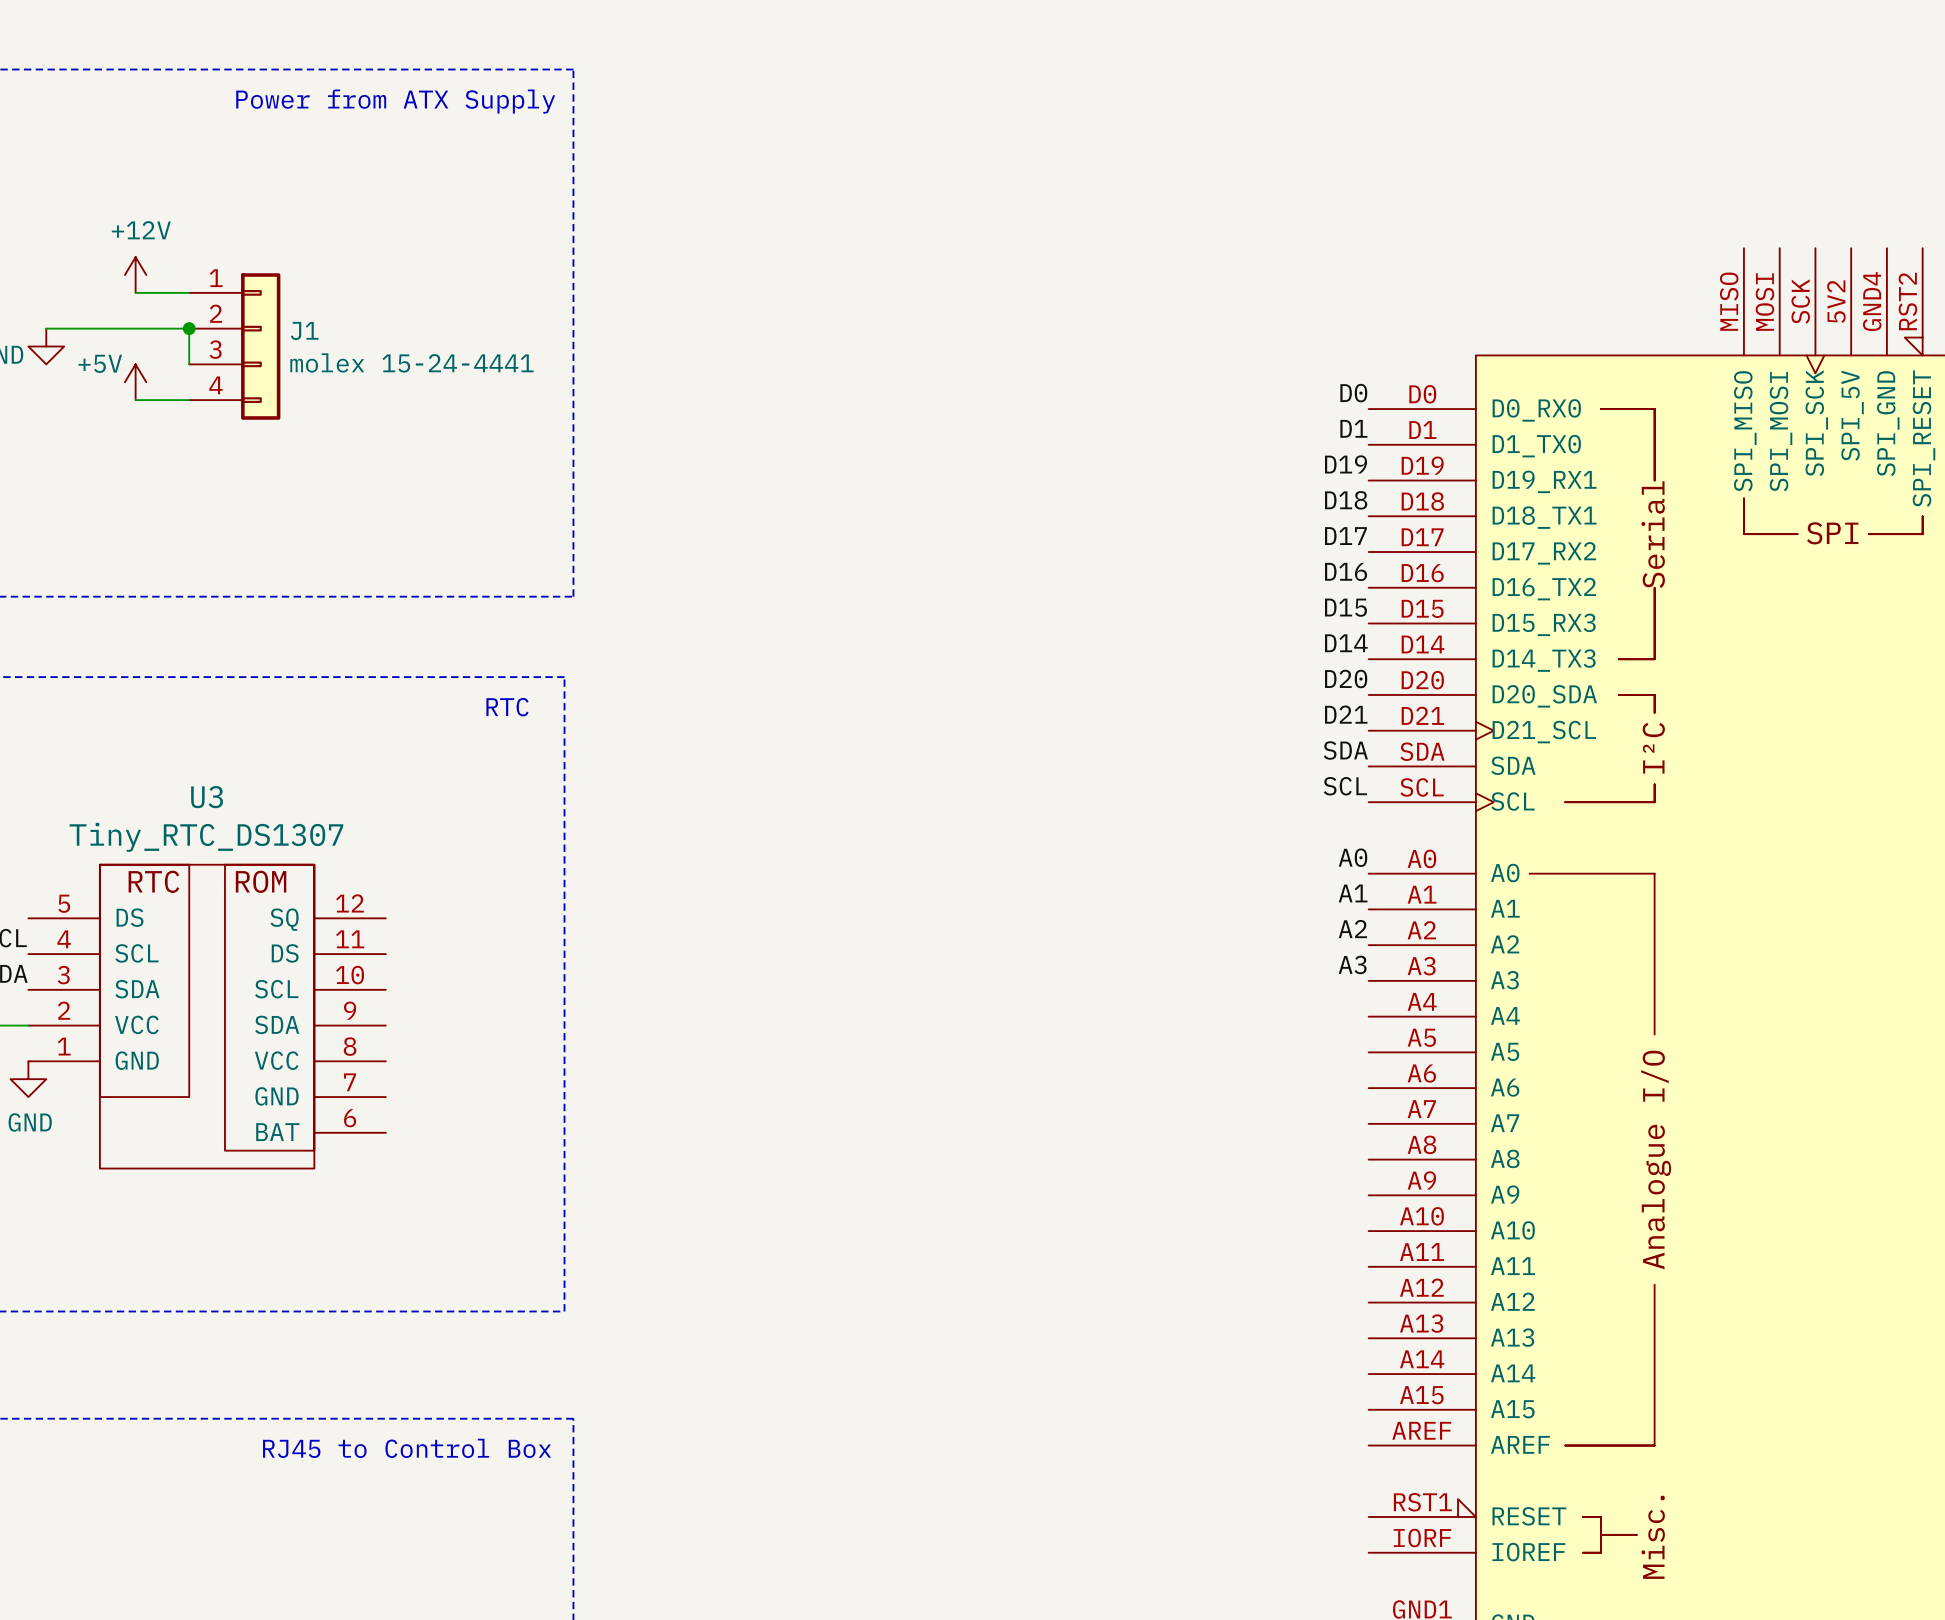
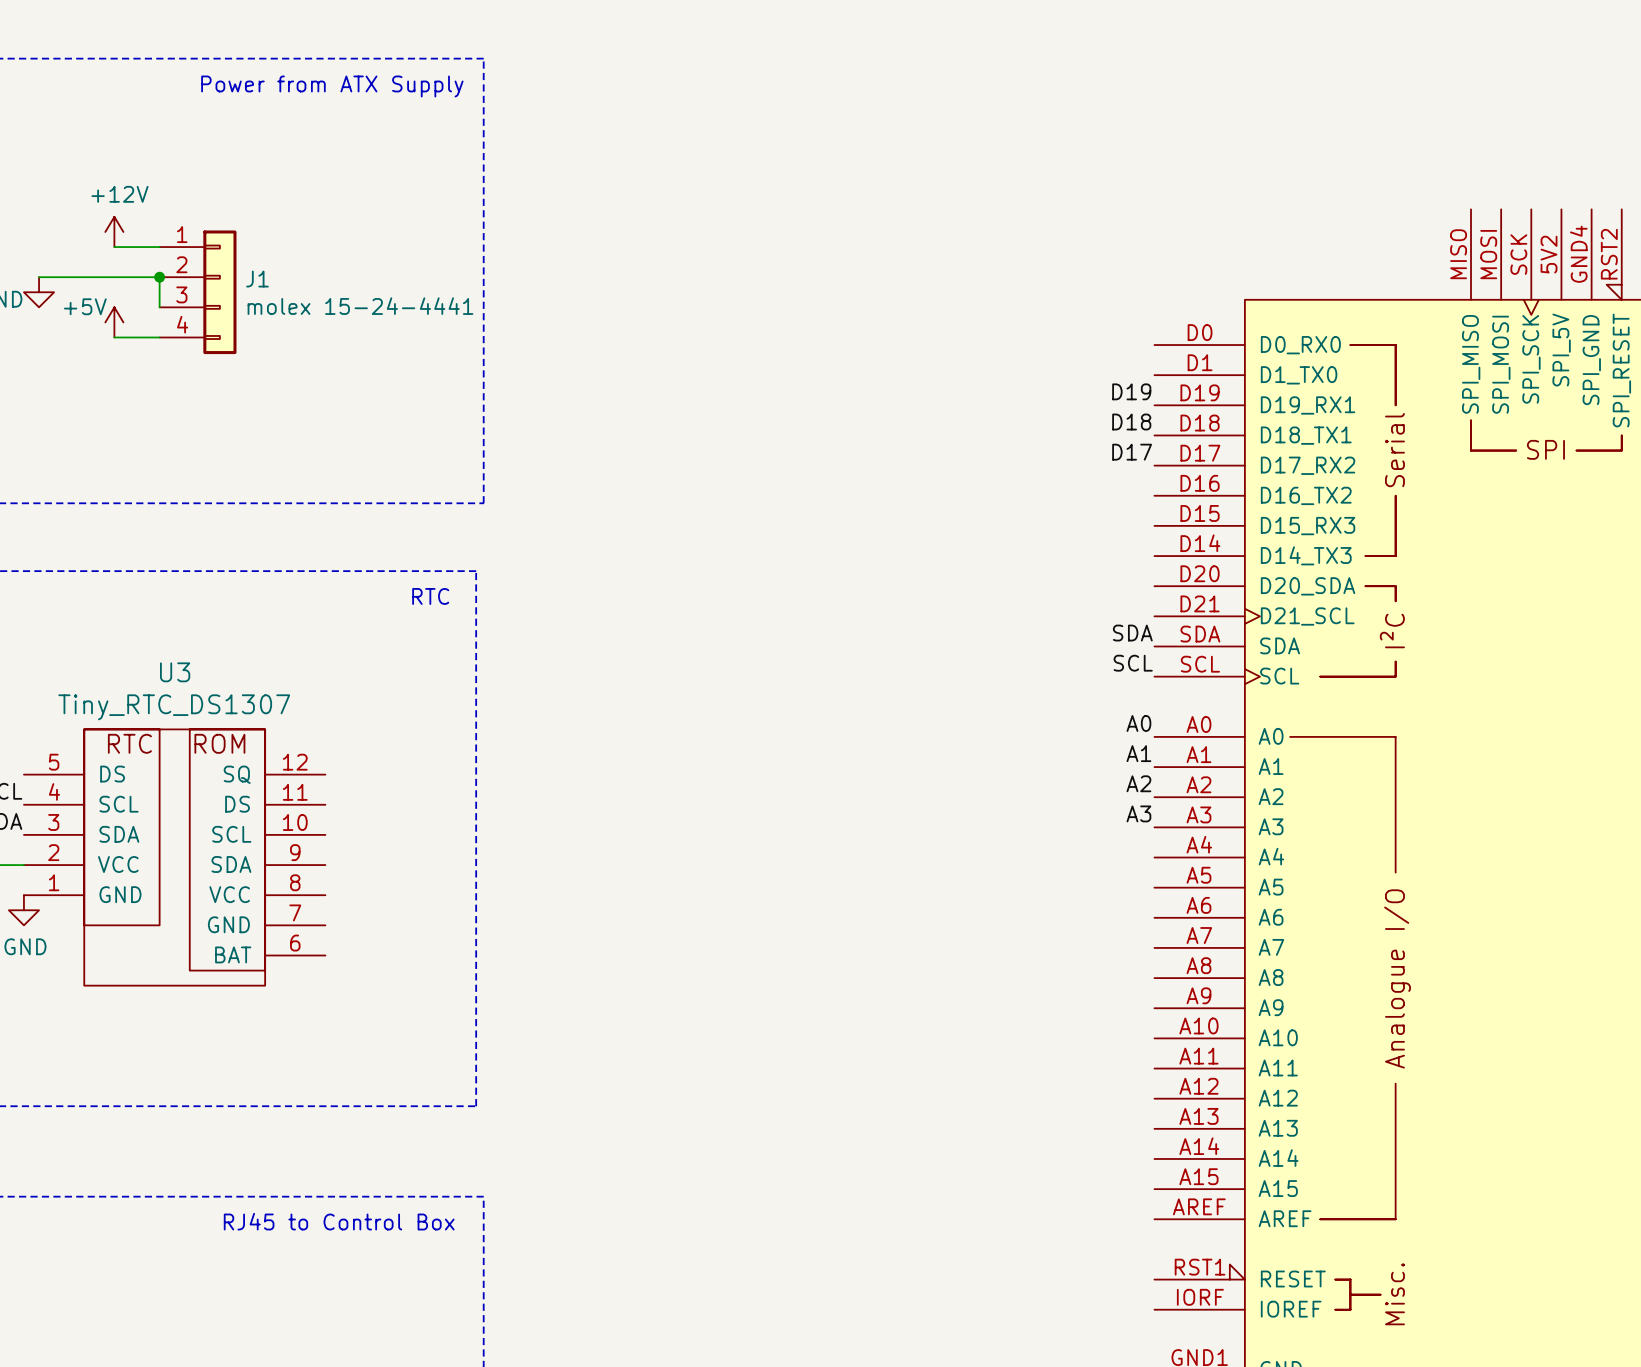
label: D0 (1353, 393) -> none
label: D1 (1353, 428) -> none
label: D16 (1346, 571) -> none
label: D15 (1345, 607) -> none
label: D14 (1346, 643) -> none
label: D20 (1346, 679) -> none
label: D21 (1346, 714) -> none

